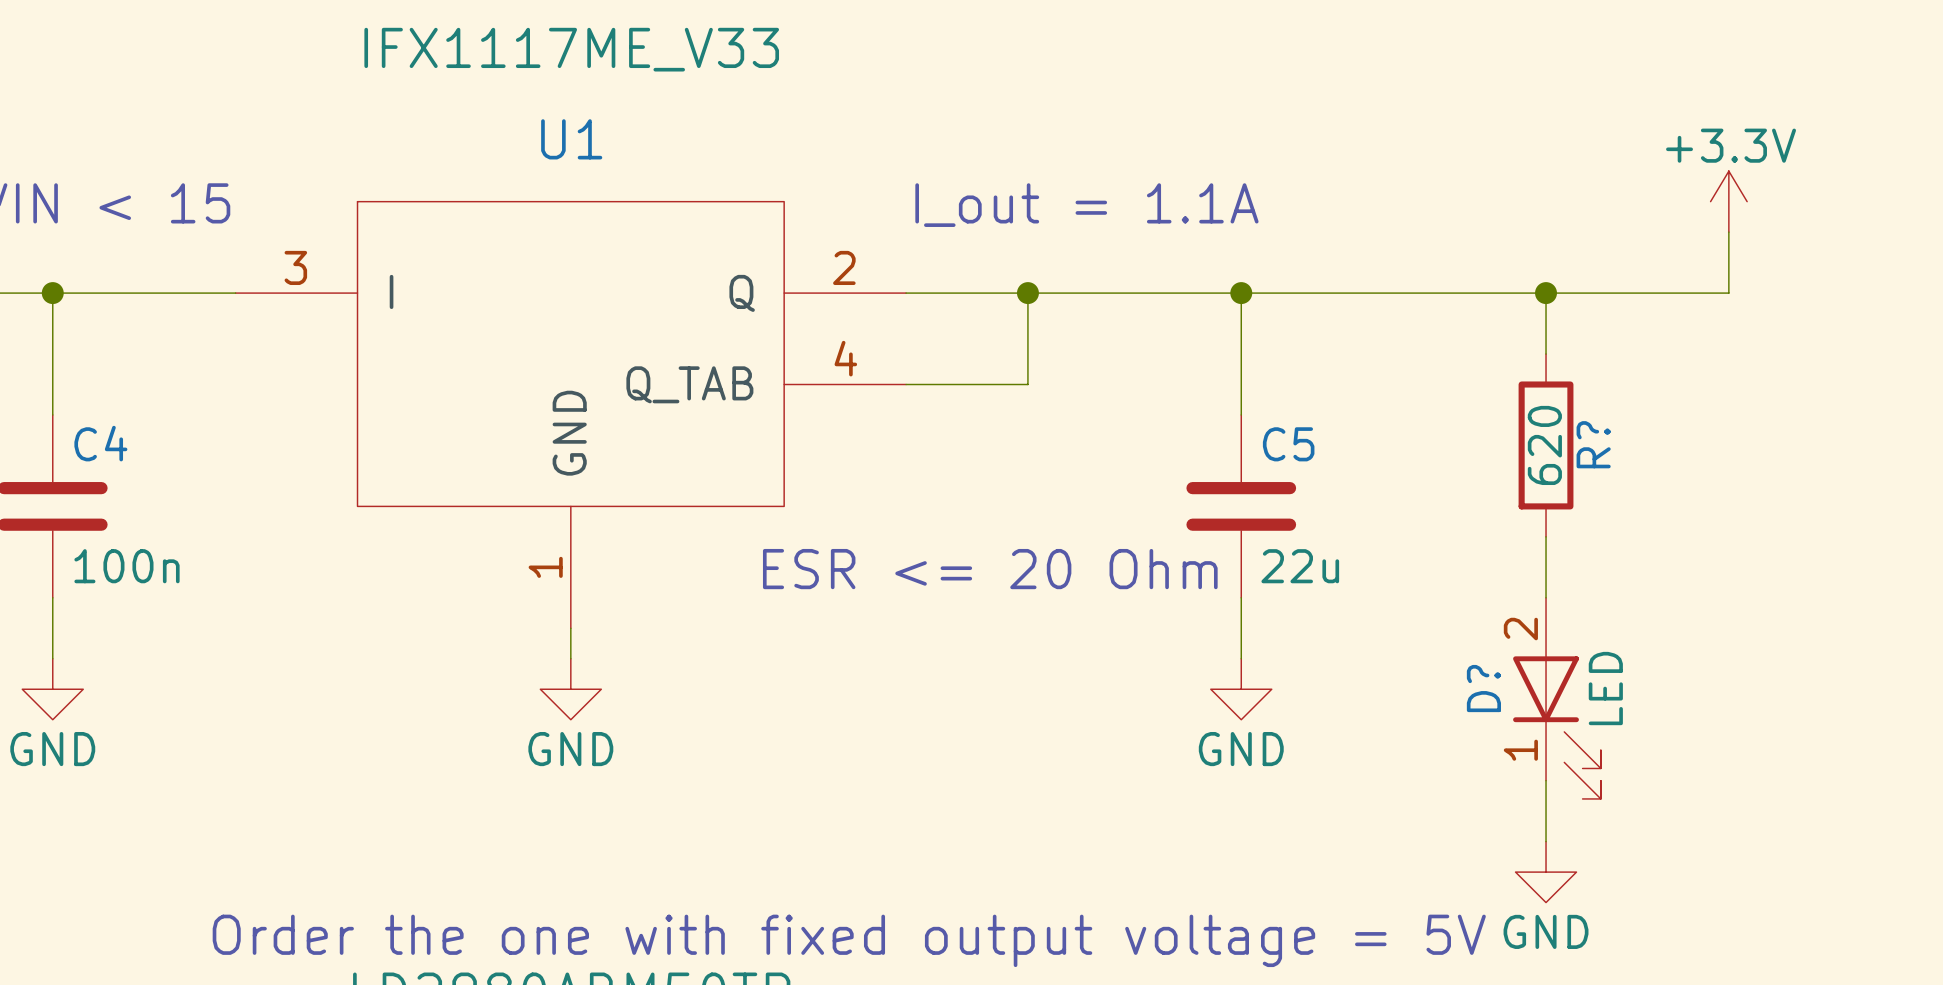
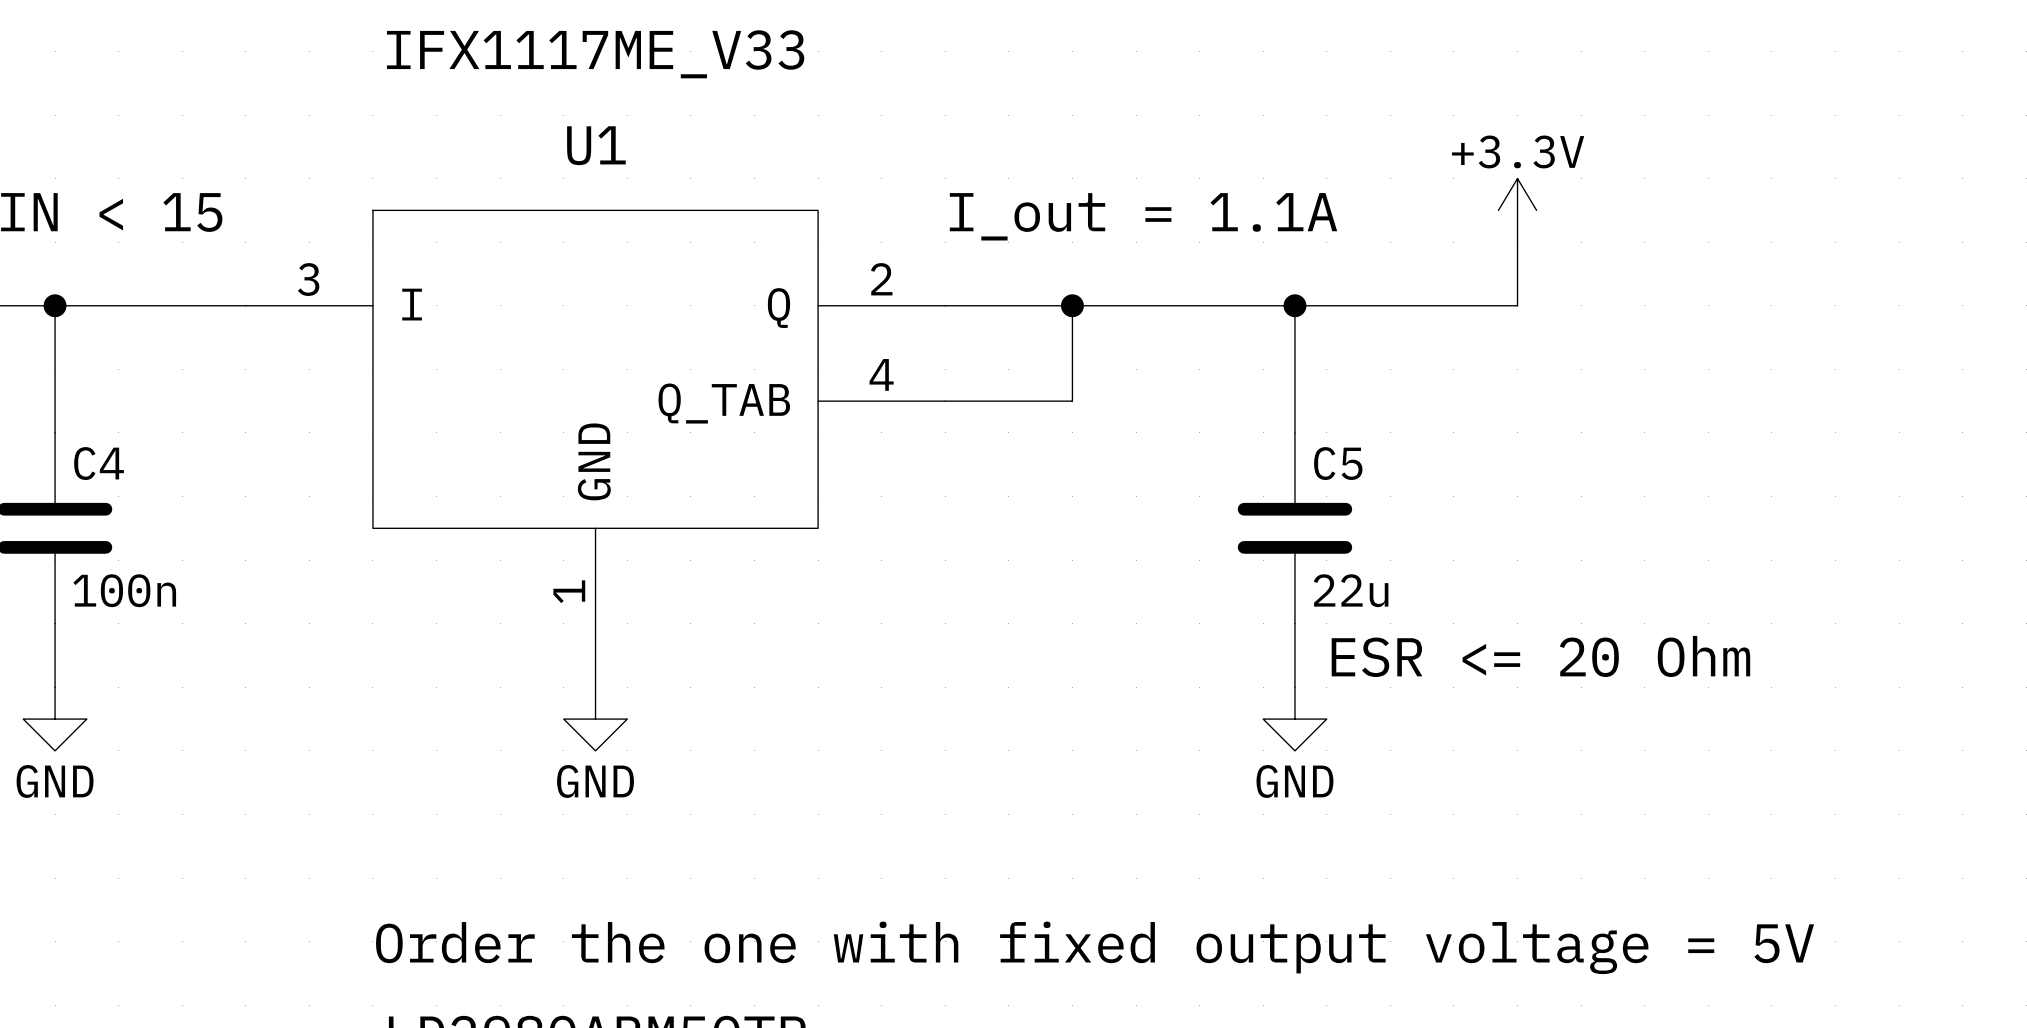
power symbol position: +3.3V (1728, 201) -> +3.3V (1517, 210)
wire: (1728, 232) (1728, 293) (1454, 293) -> (1517, 242) (1517, 305)
wire: (1546, 293) (1546, 354) -> none
junction: (1546, 293) -> none
R?: 620 (1546, 445) -> none
wire: (1546, 536) (1546, 597) -> none
text position: ESR <= 20 Ohm (990, 569) -> ESR <= 20 Ohm (1540, 656)
D?: LED (1556, 698) -> none
wire: (1546, 780) (1546, 841) -> none
power symbol: GND (1546, 872) -> none
text position: Order the one with fixed output voltage = 5V (849, 940) -> Order the one with fixed output voltage = 5V (1095, 947)

